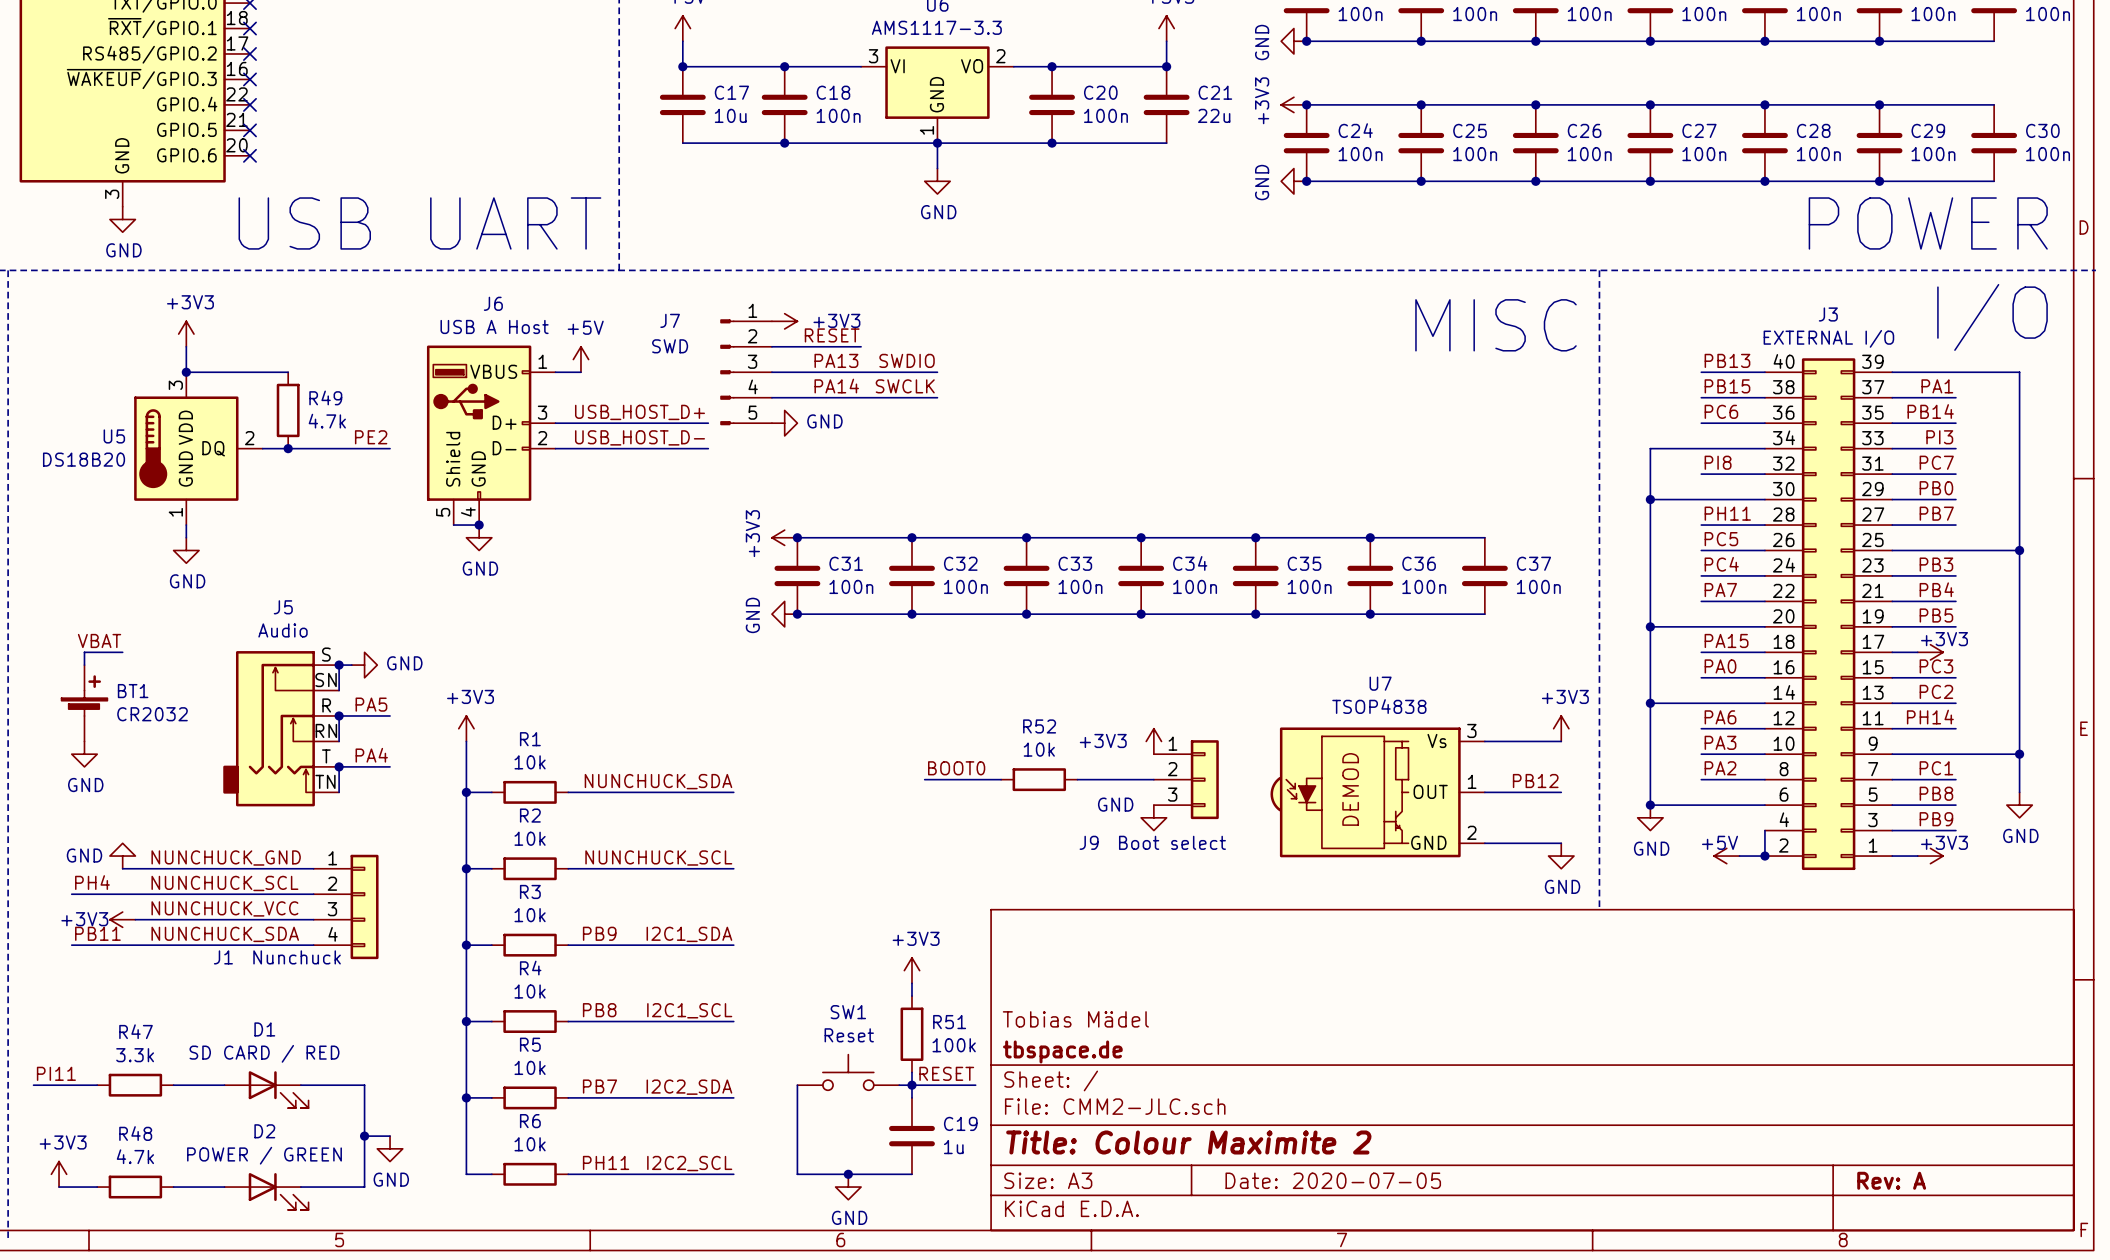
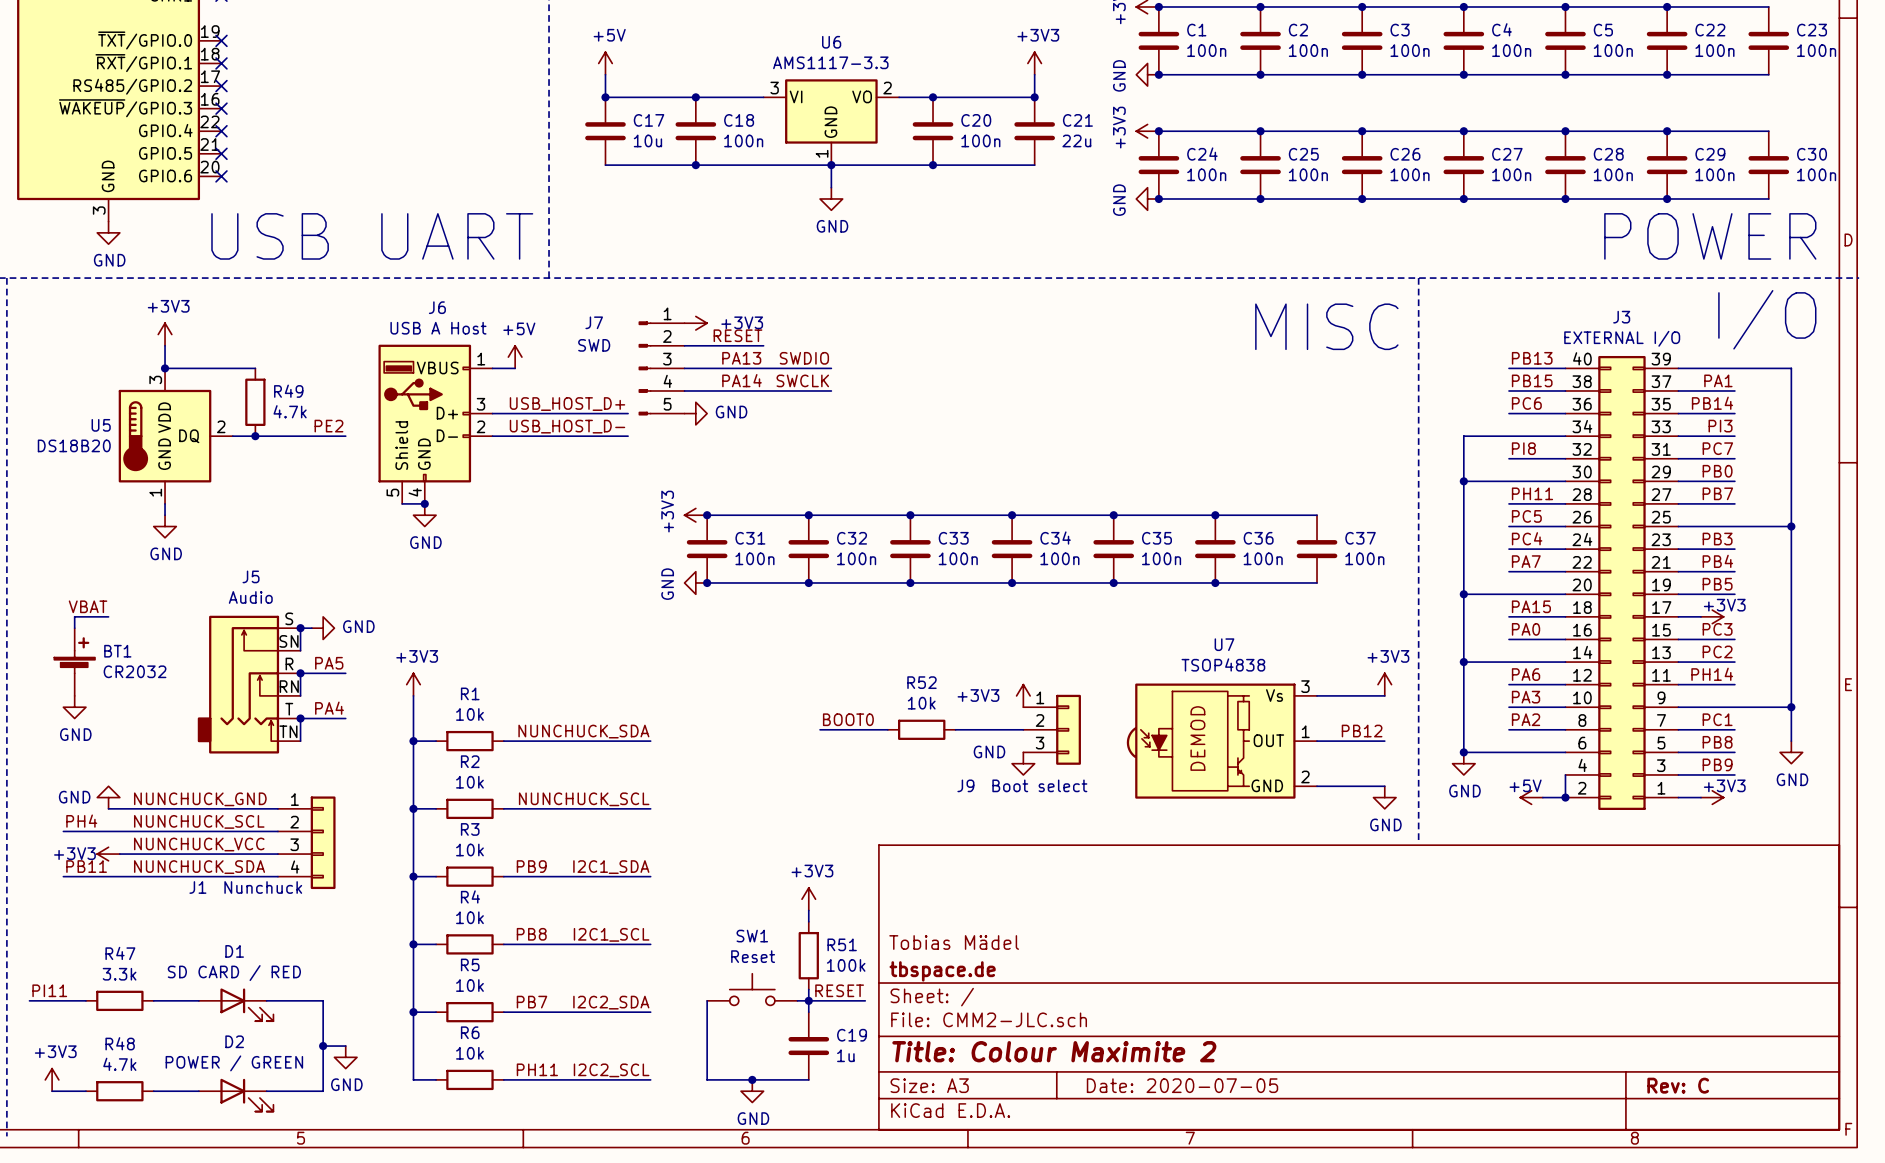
title block: Rev: A (1891, 1180) -> Rev: C (1678, 1085)

